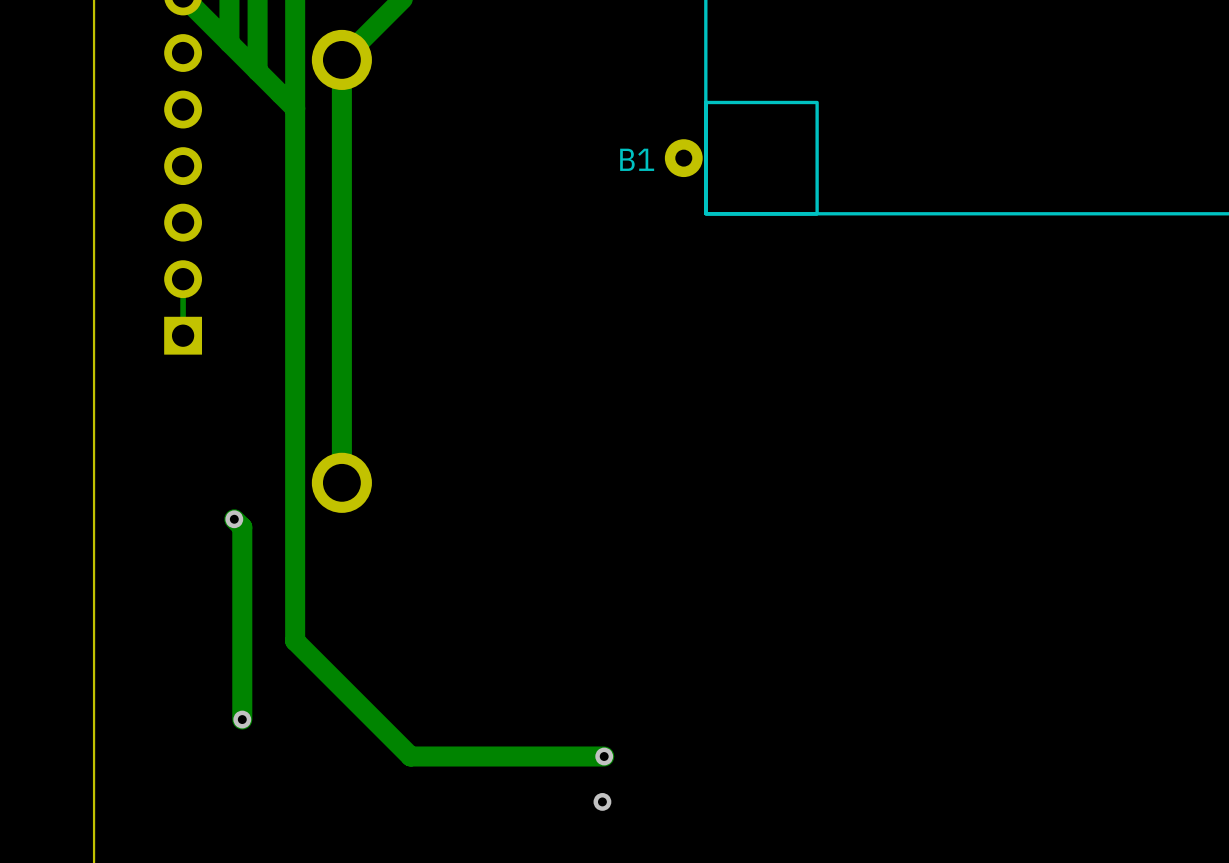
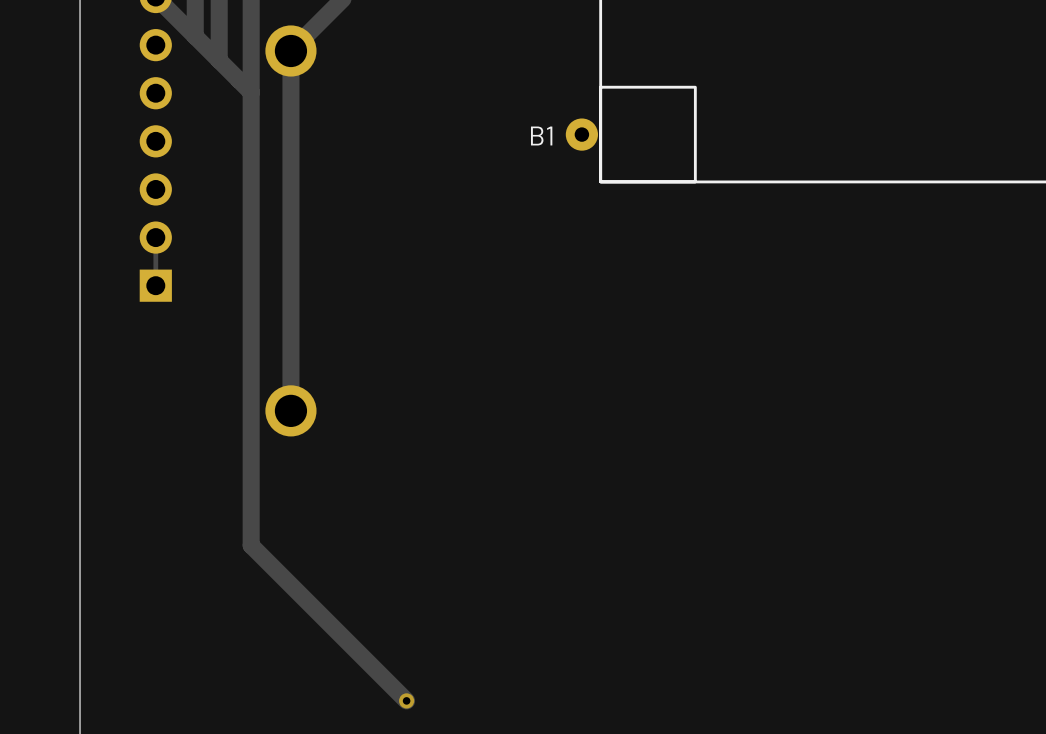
track: (234, 519) (242, 527) (242, 719) -> none
via: (234, 519) -> none
via: (242, 719) -> none
track: (604, 756) (410, 756) -> (406, 700) (349, 643)
via: (604, 756) -> none
via: (602, 801) -> none
via: none -> (406, 700)

